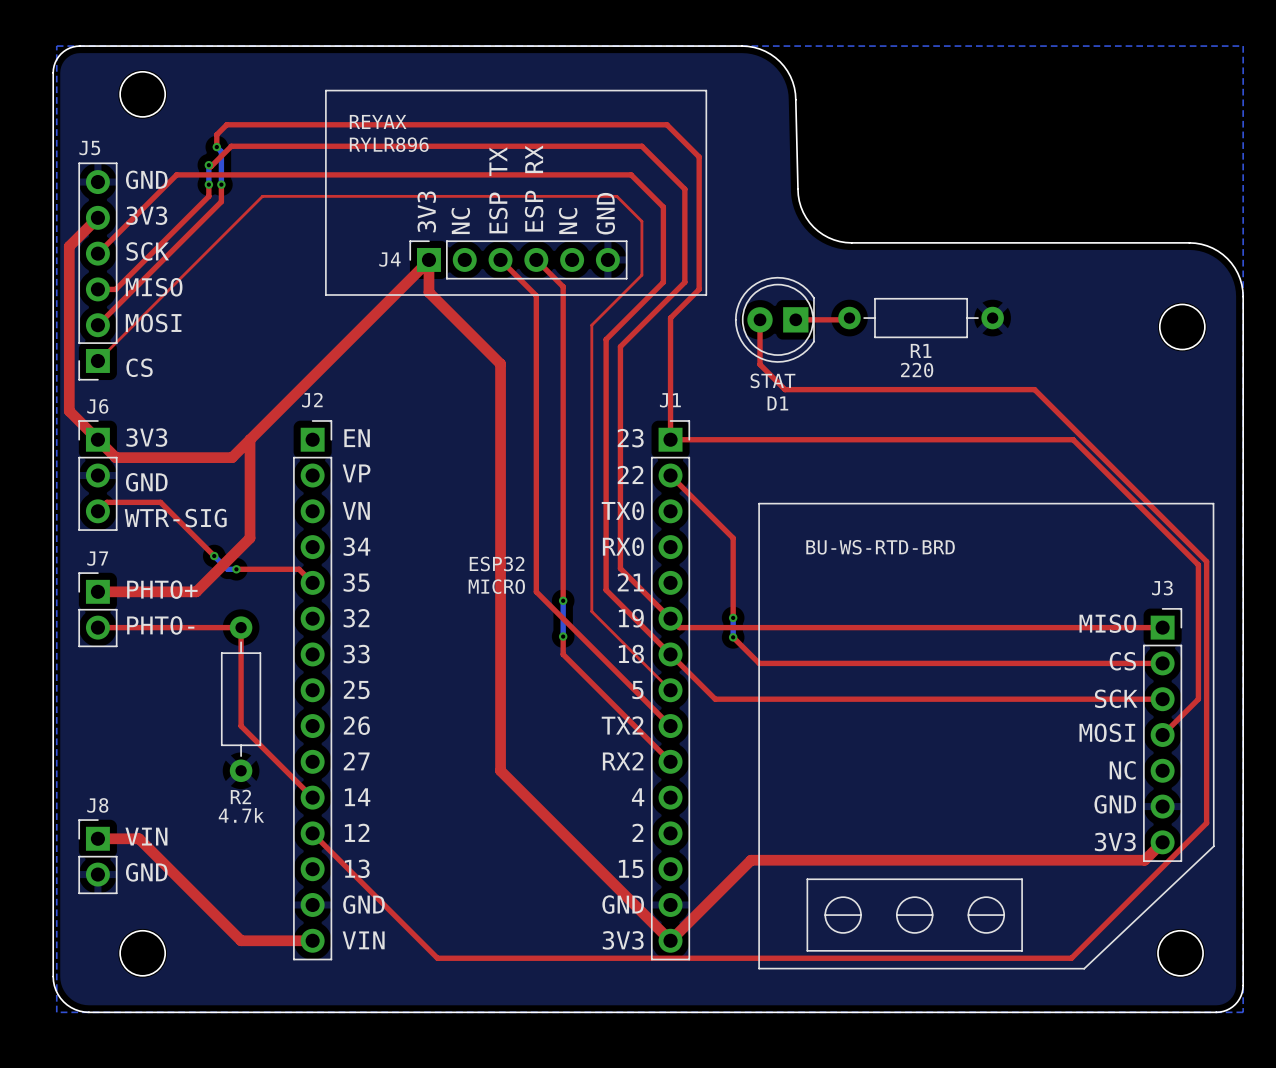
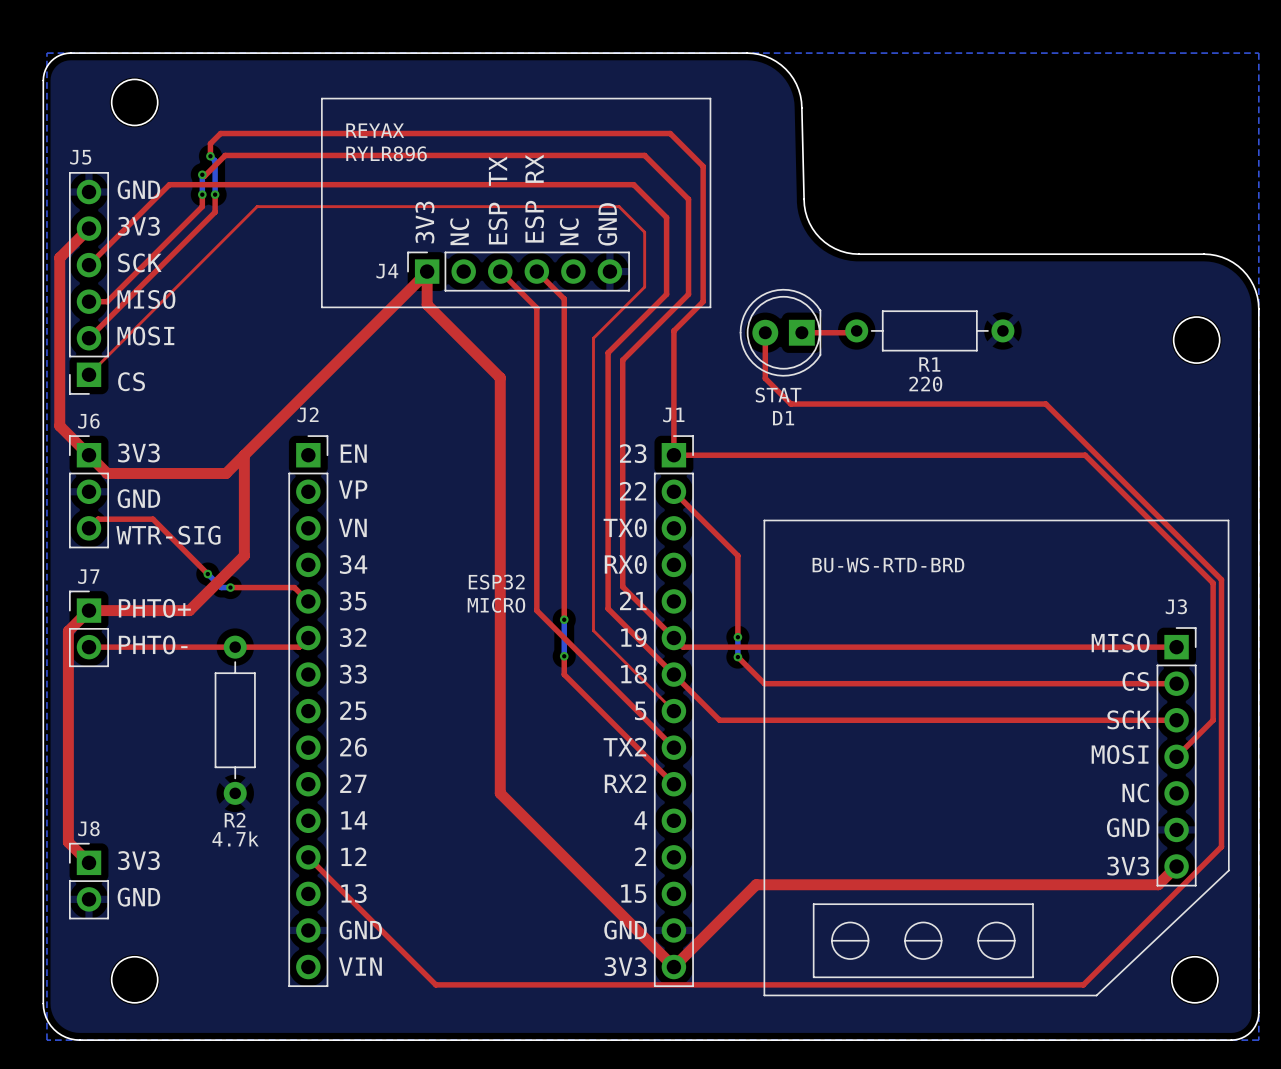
top track: (241, 627) (241, 726) (312, 797) -> (235, 647) (299, 647) (308, 638)
text: VIN (146, 836) -> 3V3 (138, 860)
top track: (97, 838) (139, 838) (241, 940) (312, 940) -> (89, 862) (68, 842) (68, 631) (89, 610)

